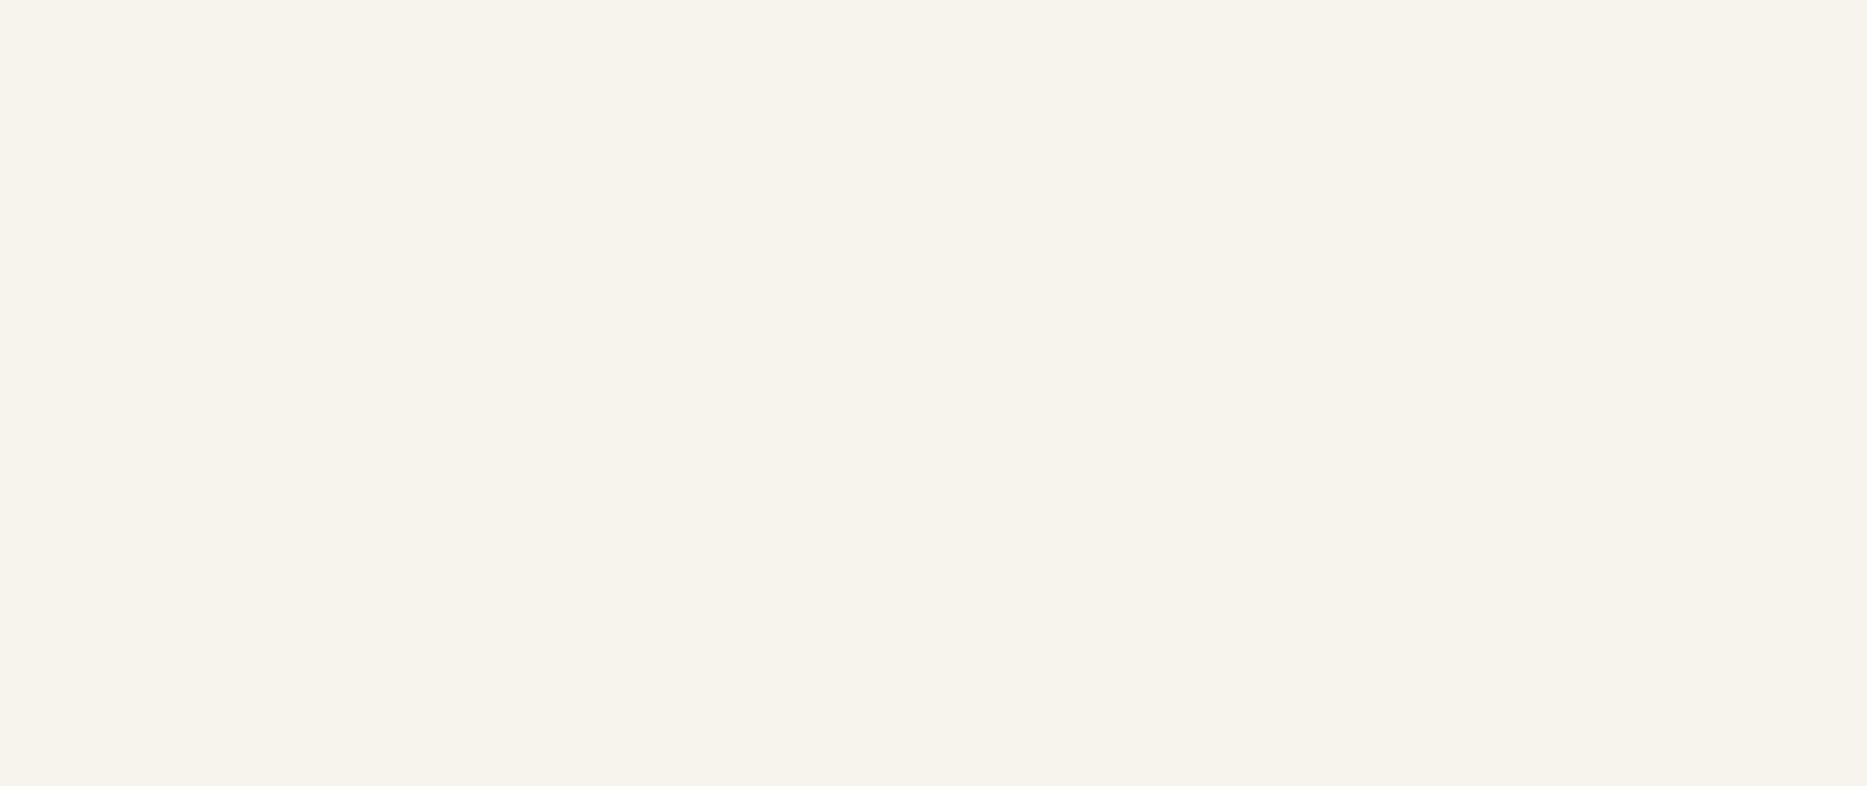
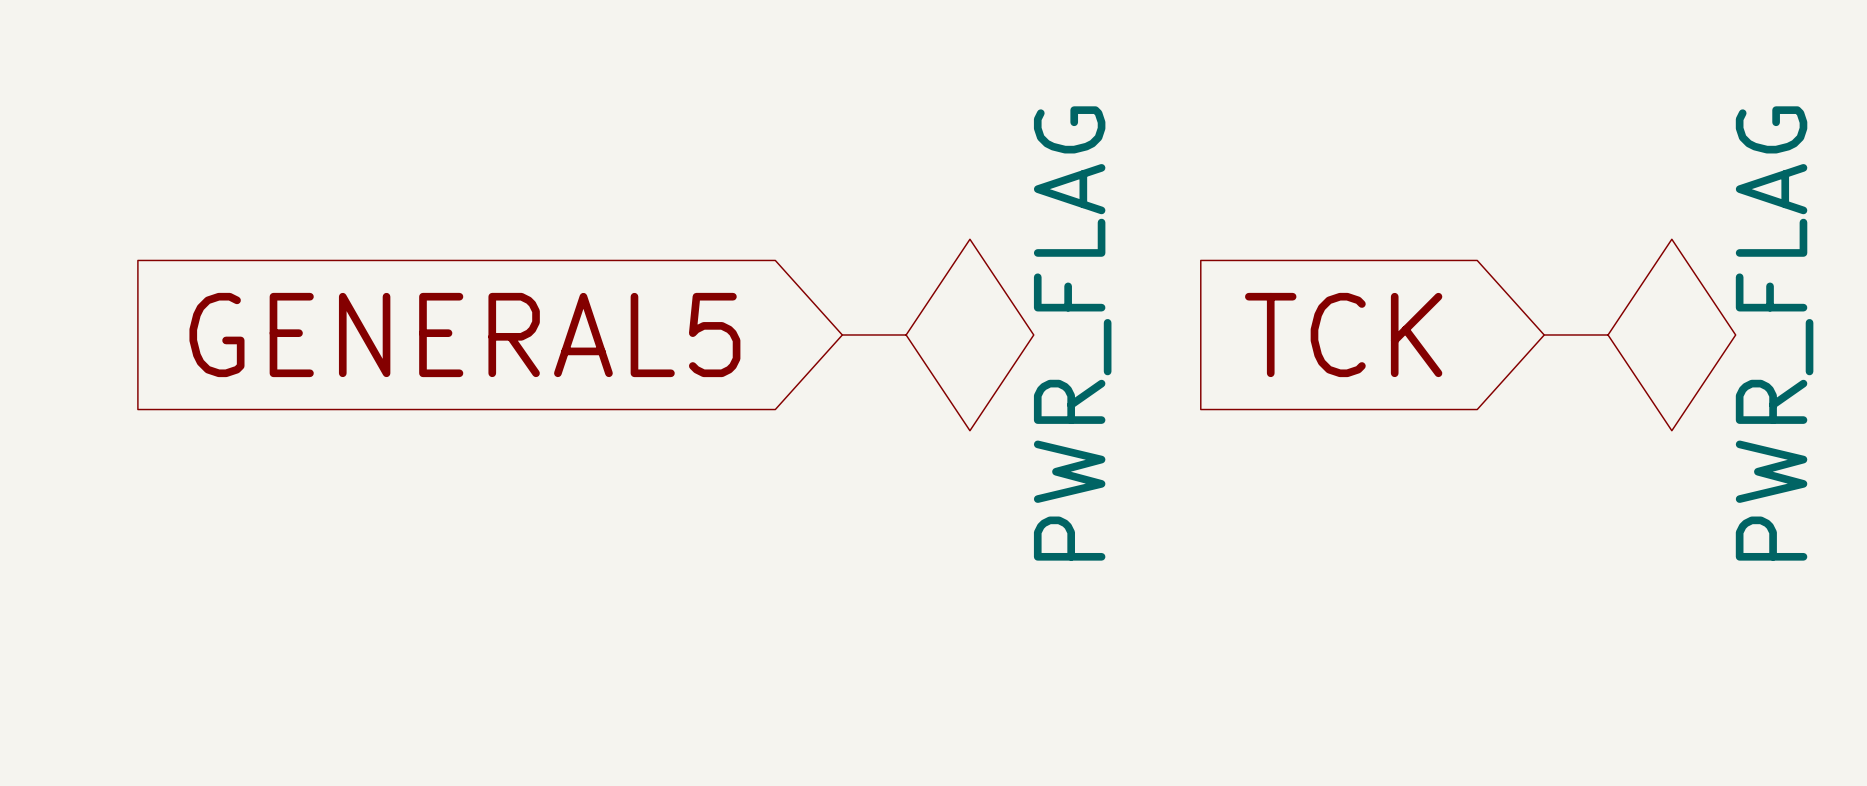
global label: none -> GENERAL5 (464, 334)
power symbol: none -> PWR_FLAG (938, 334)
global label: none -> TCK (1343, 334)
power symbol: none -> PWR_FLAG (1639, 334)

